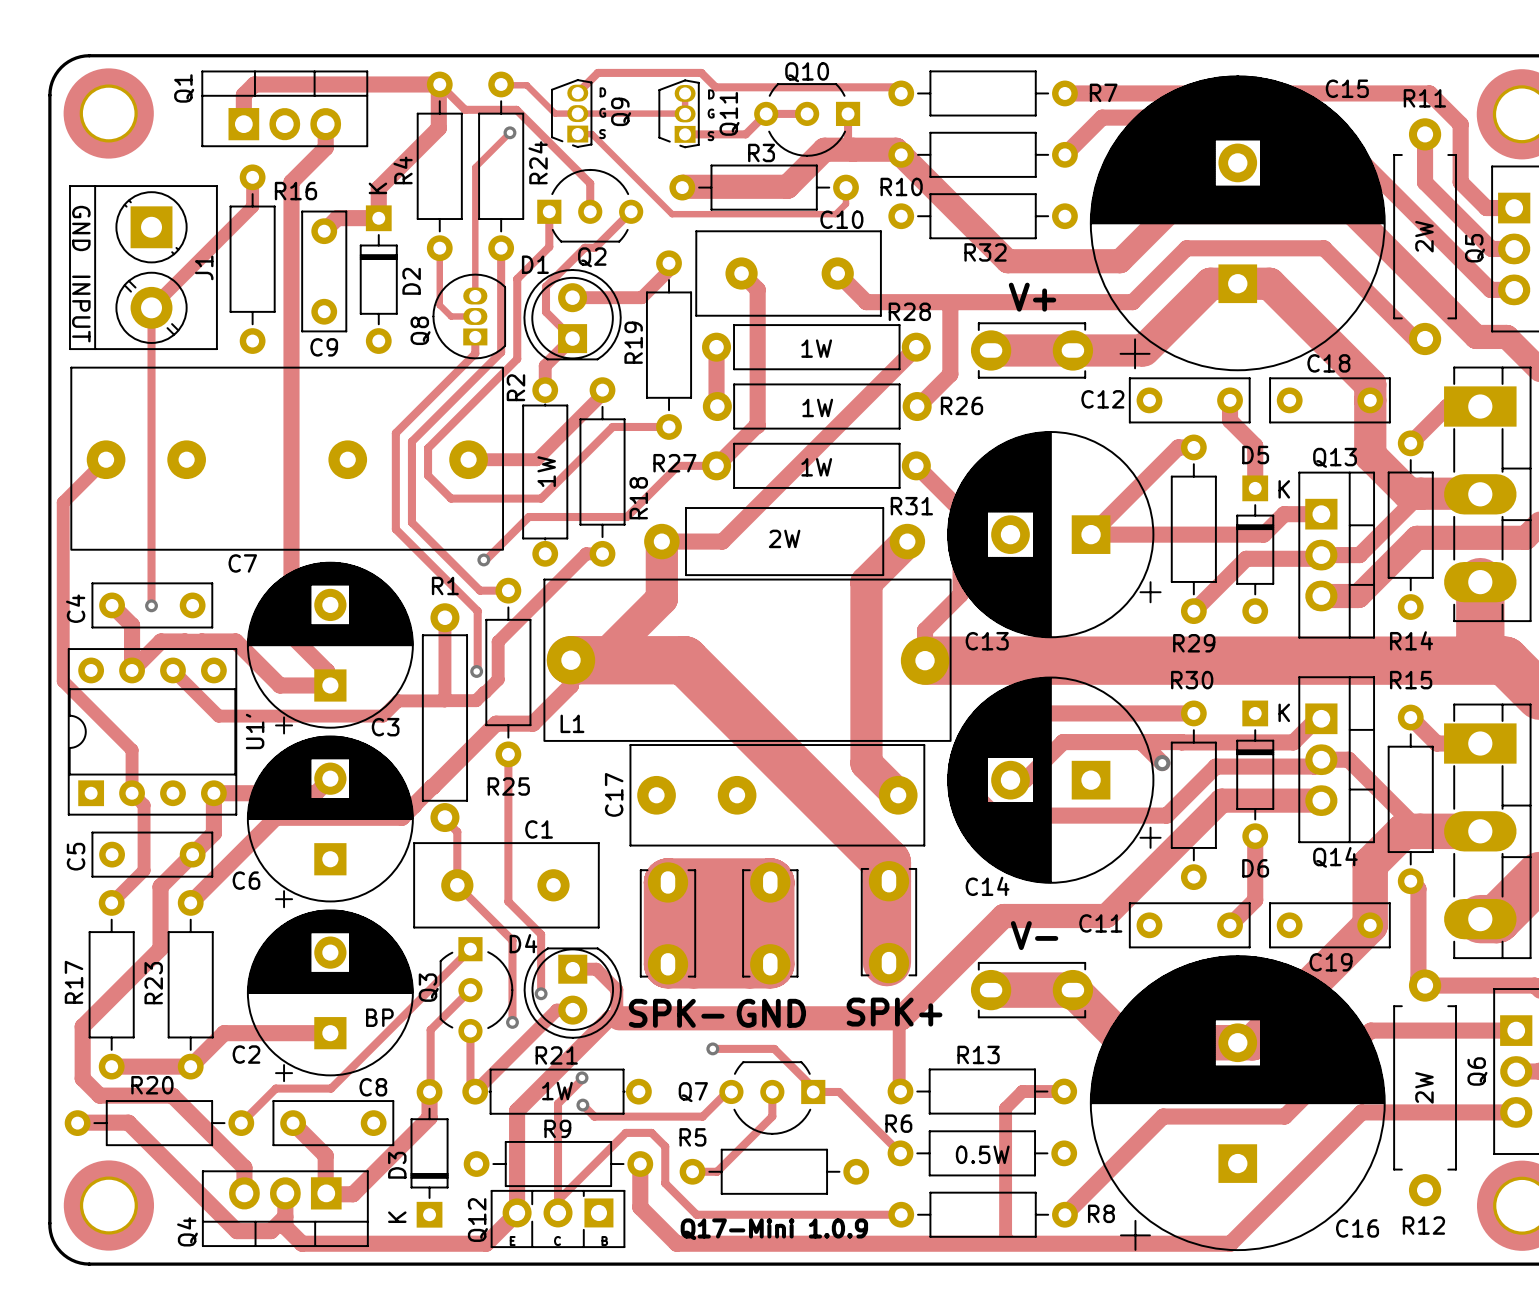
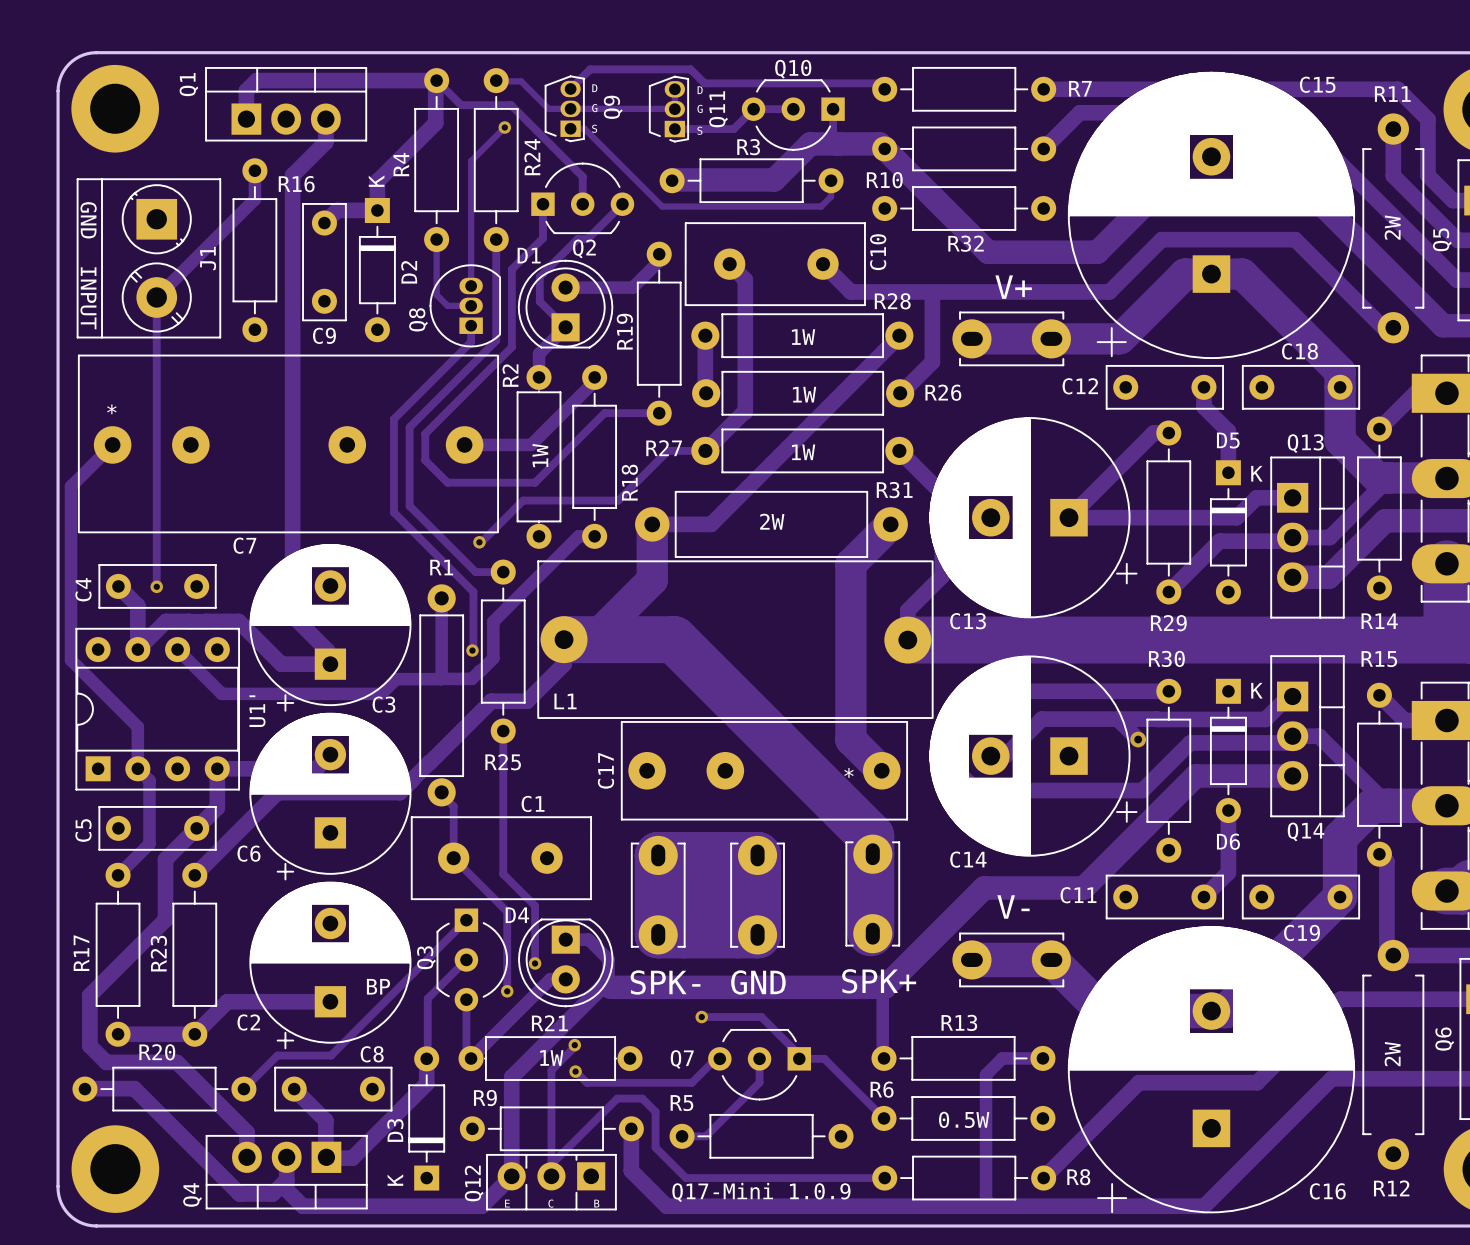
C10 name rotation: 0° (841, 219) -> 90° counterclockwise (878, 252)
C10 name position: C10 (841, 219) -> C10 (878, 252)
text: none -> * (111, 409)
text: none -> * (848, 772)
R9 name position: R9 (557, 1128) -> R9 (485, 1098)

